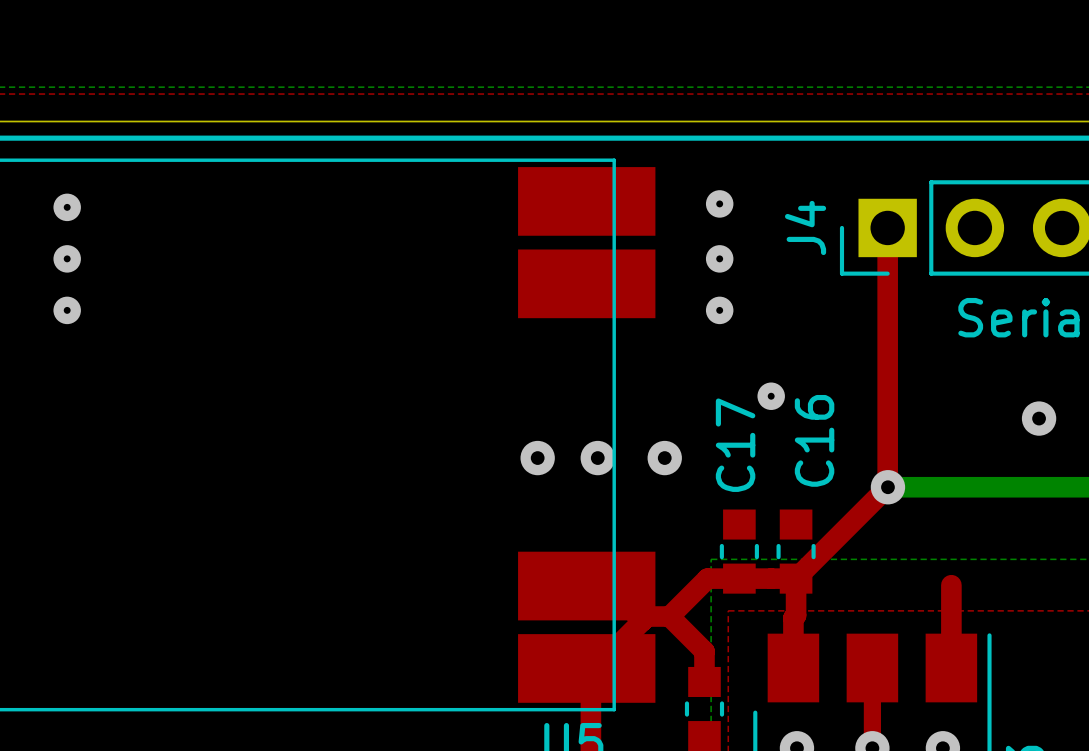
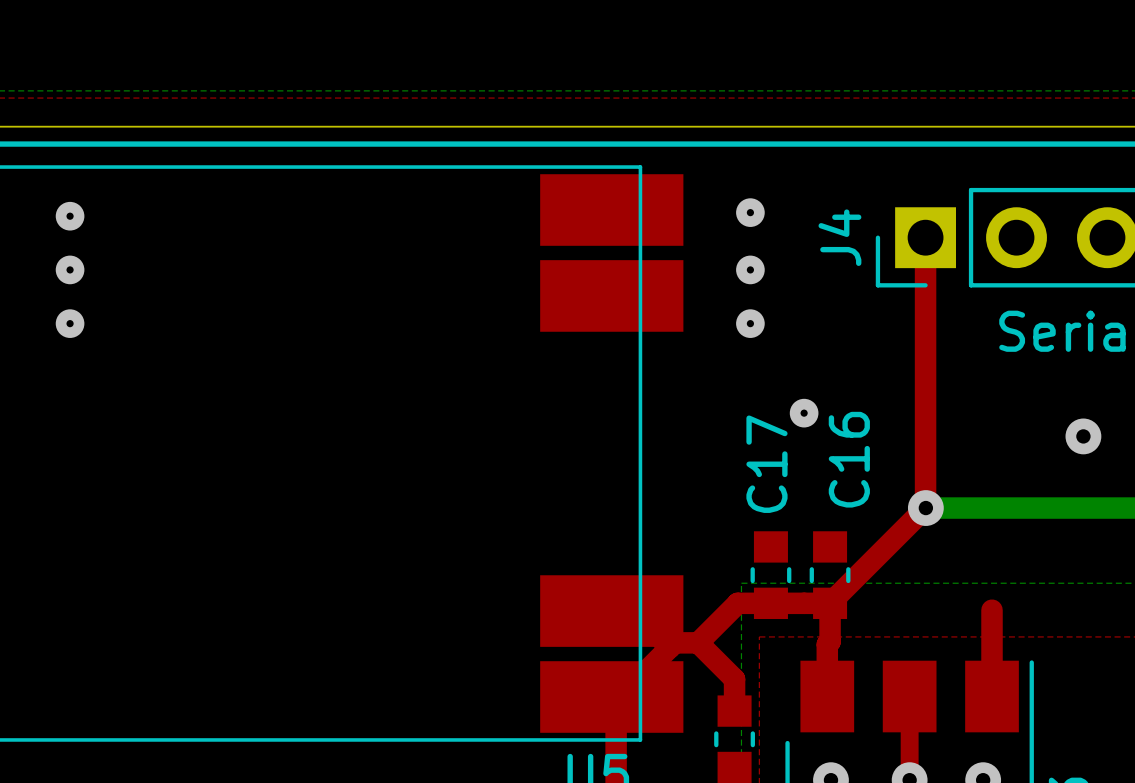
via: (537, 458) -> none
via: (597, 458) -> none
via: (664, 458) -> none

